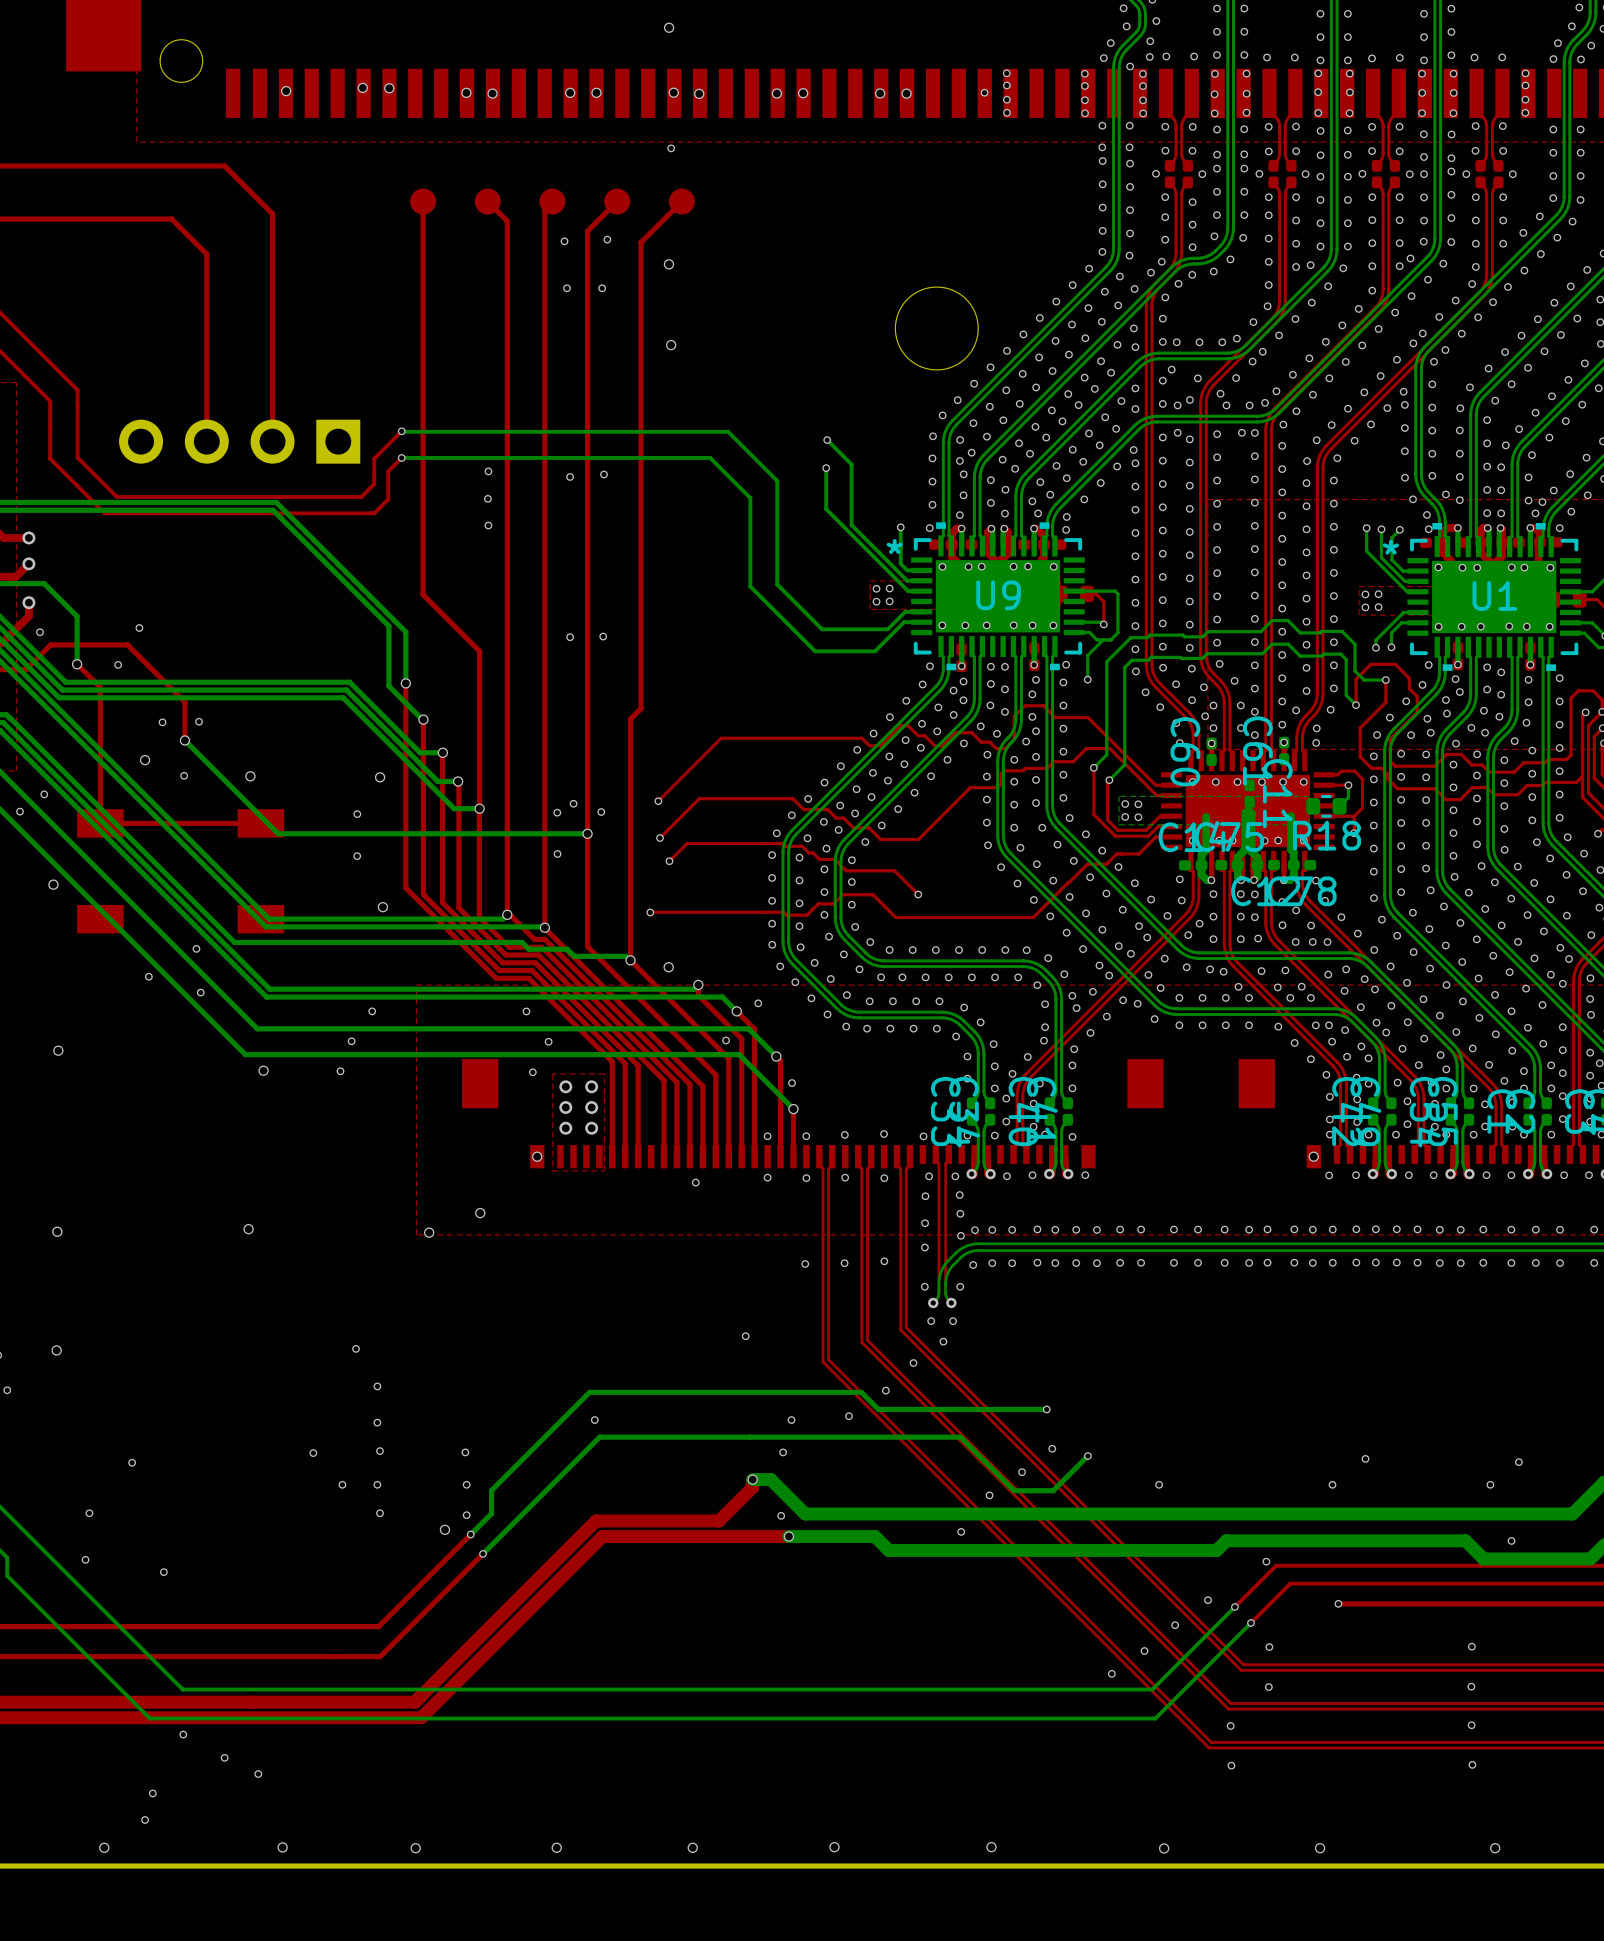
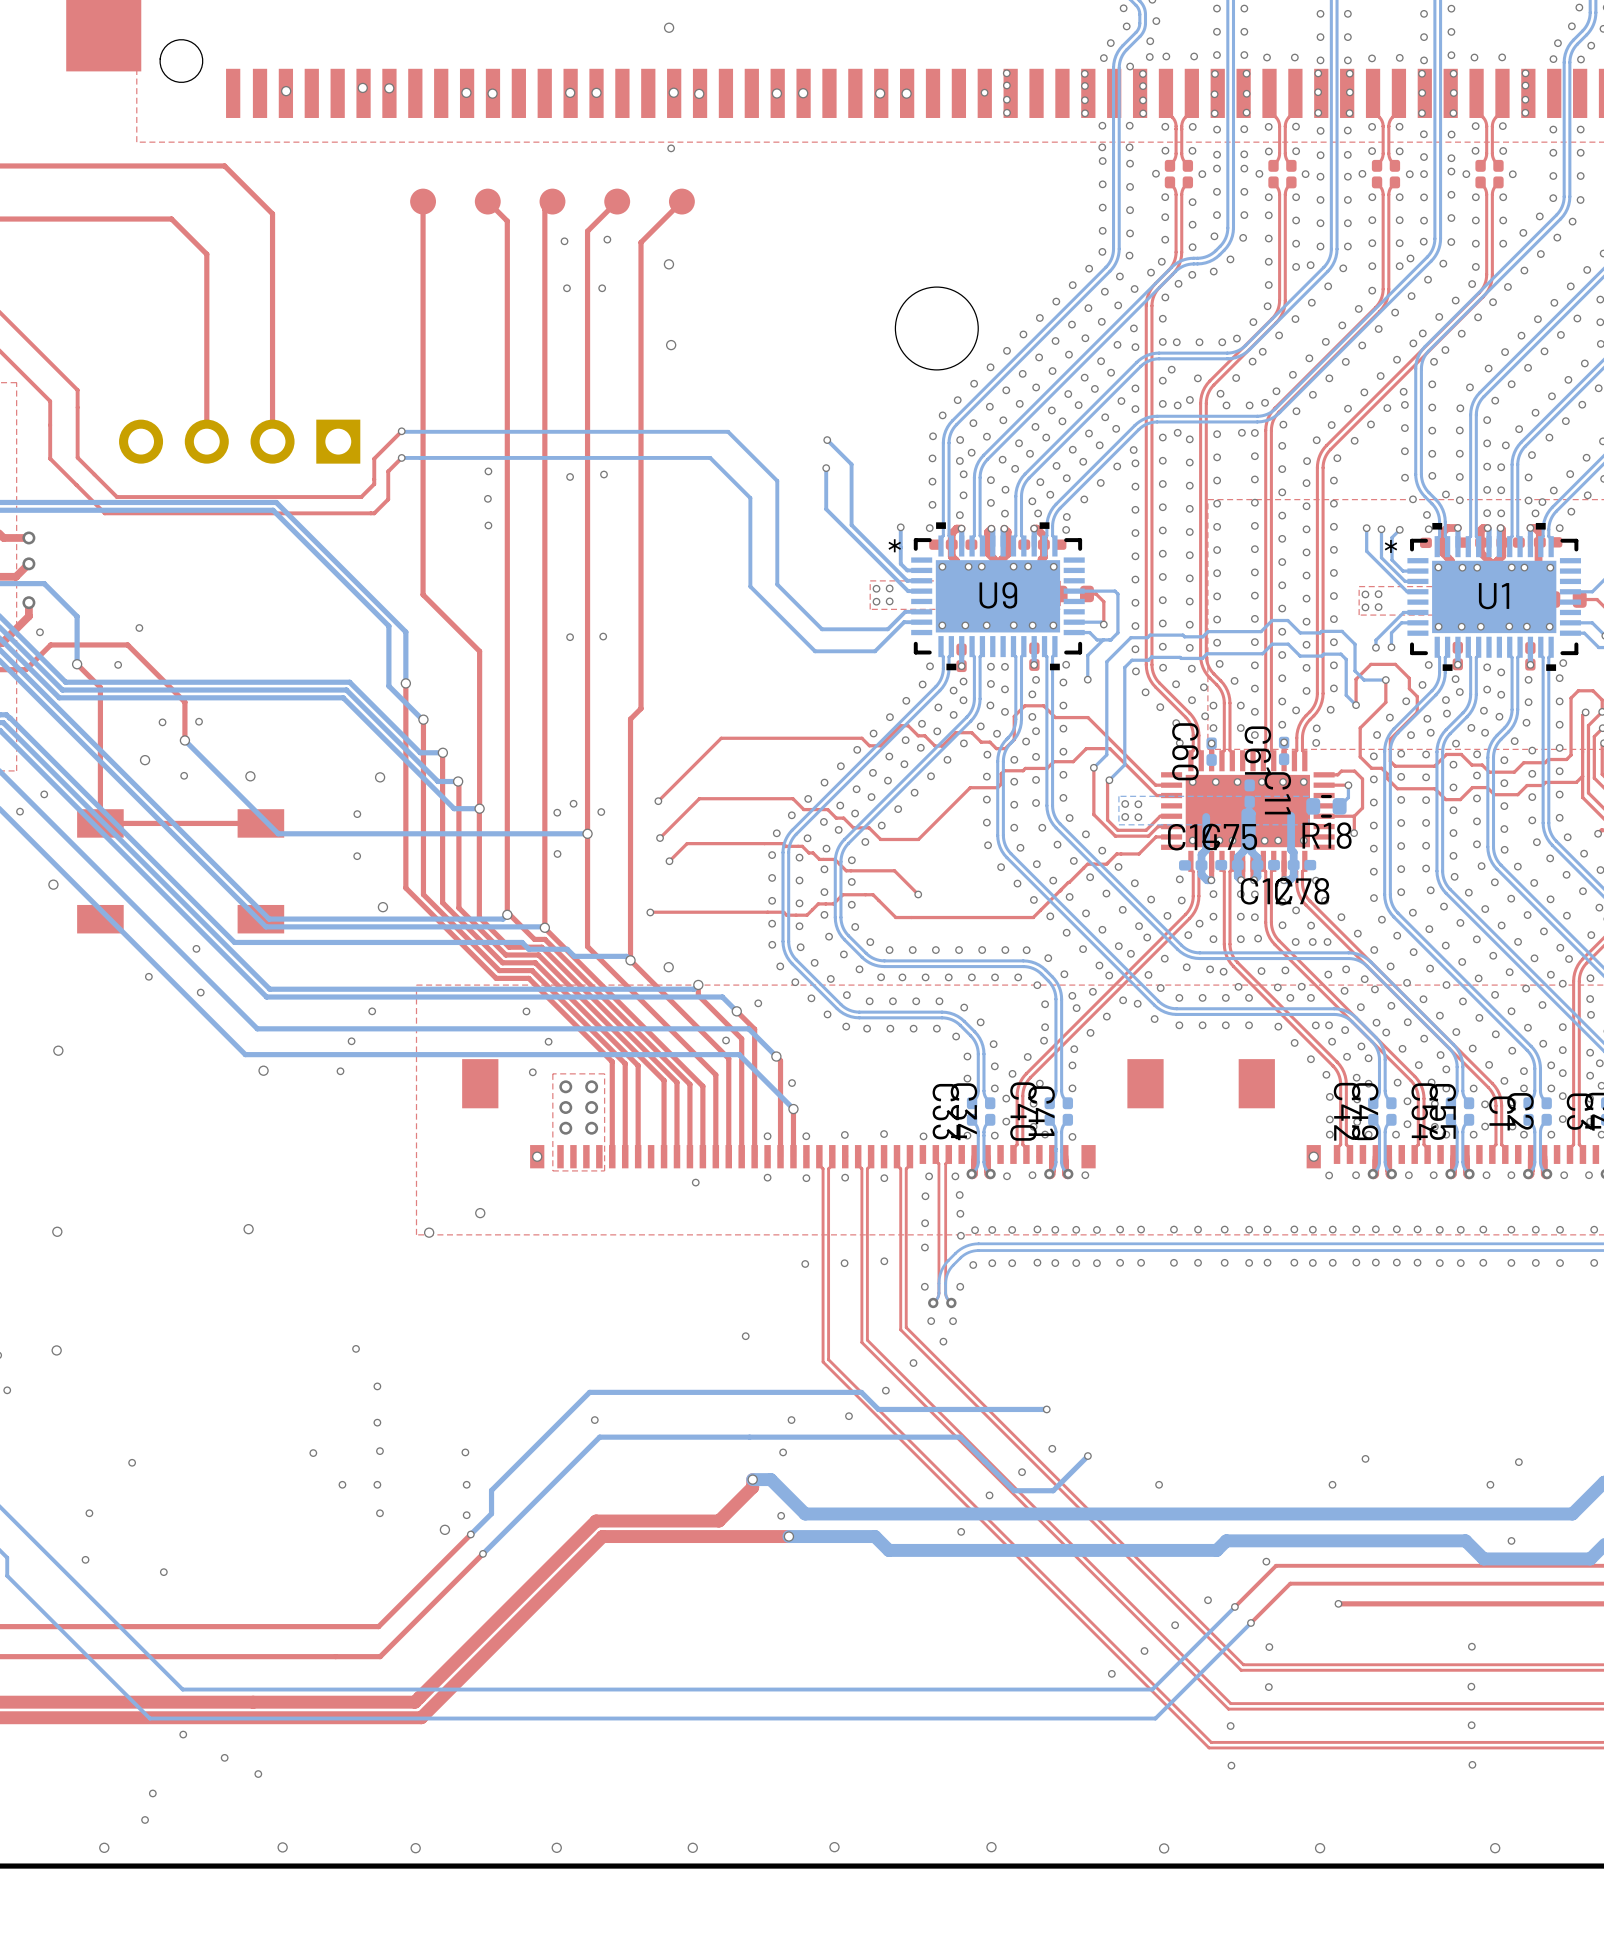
via: none -> (1563, 663)

